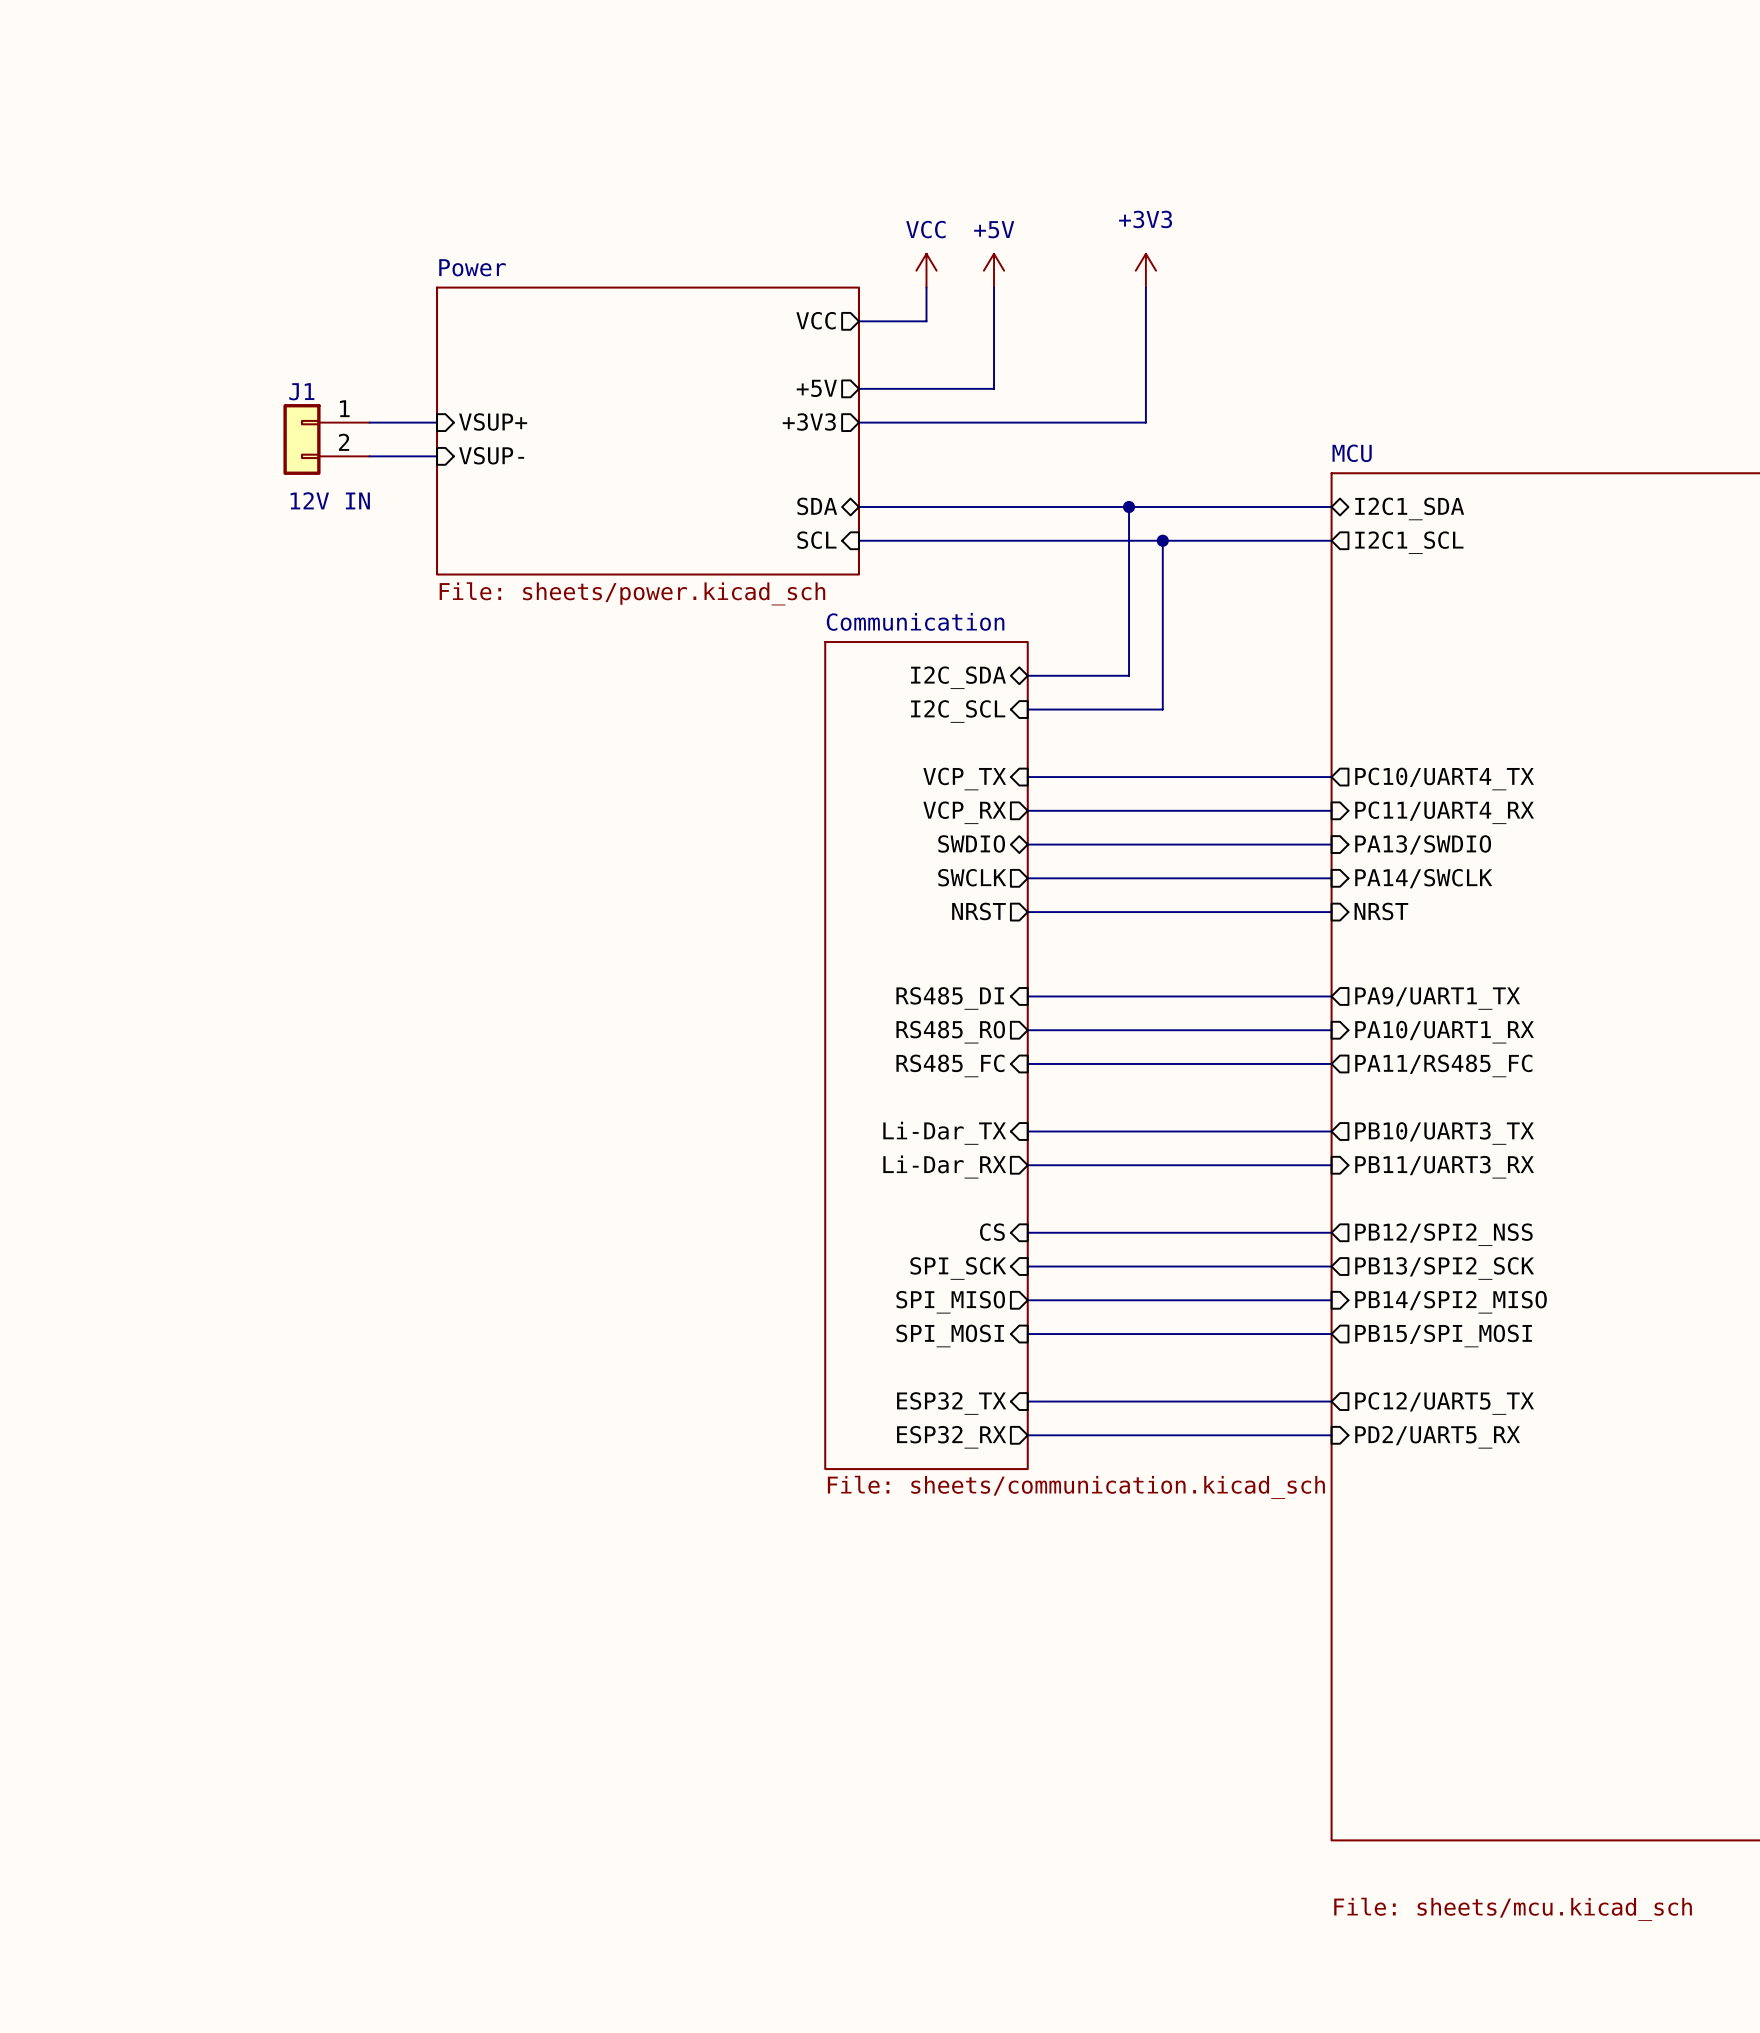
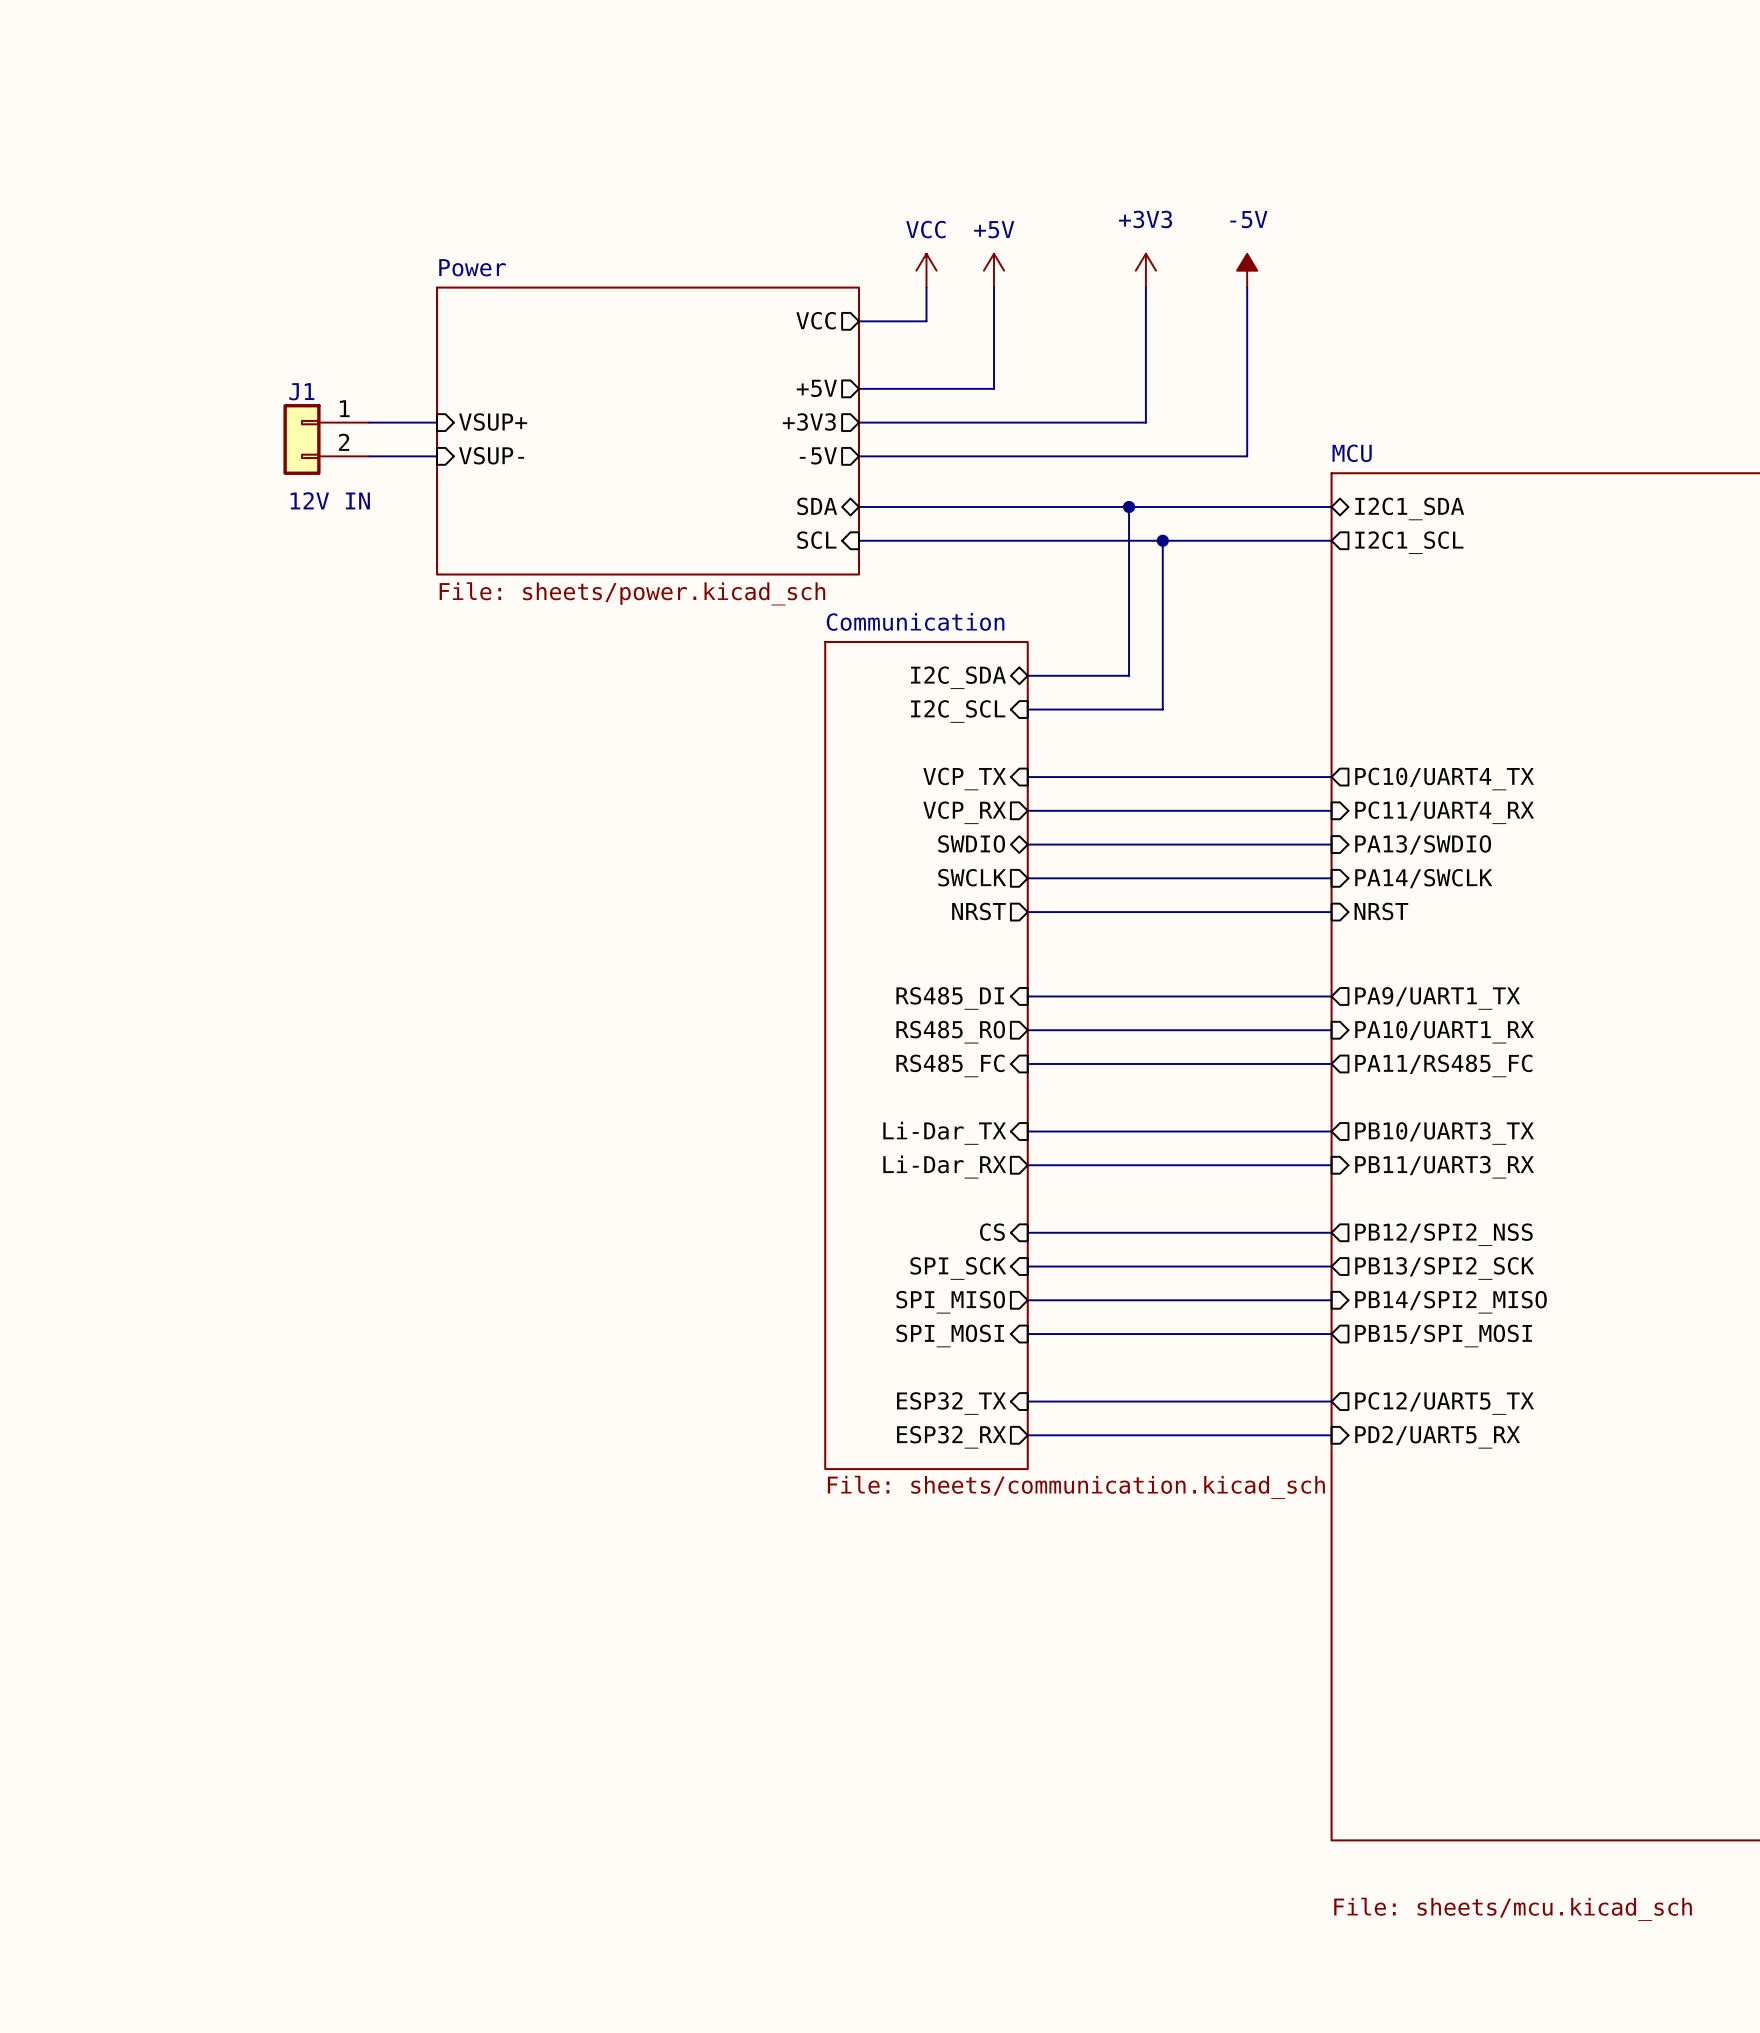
power symbol: none -> -5V (1247, 270)
wire: none -> (1247, 287) (1247, 456) (858, 456)
sheet pin: none -> -5V (818, 455)

